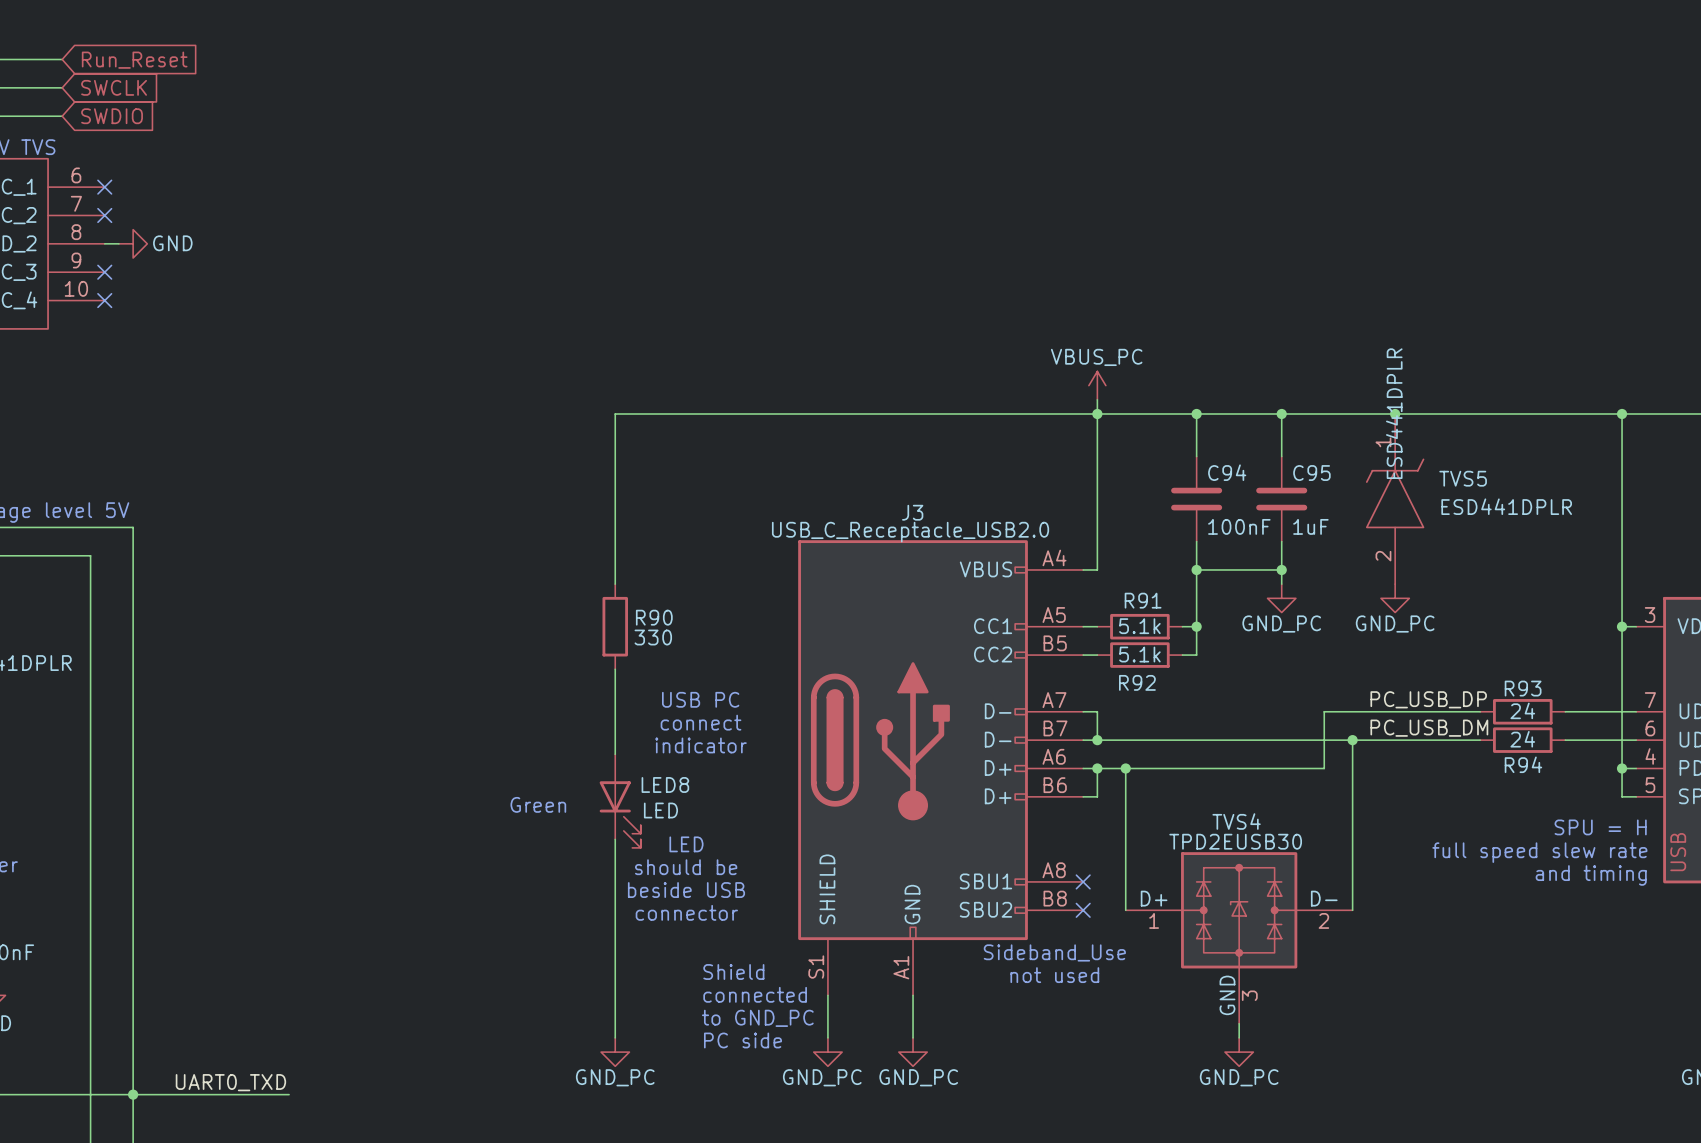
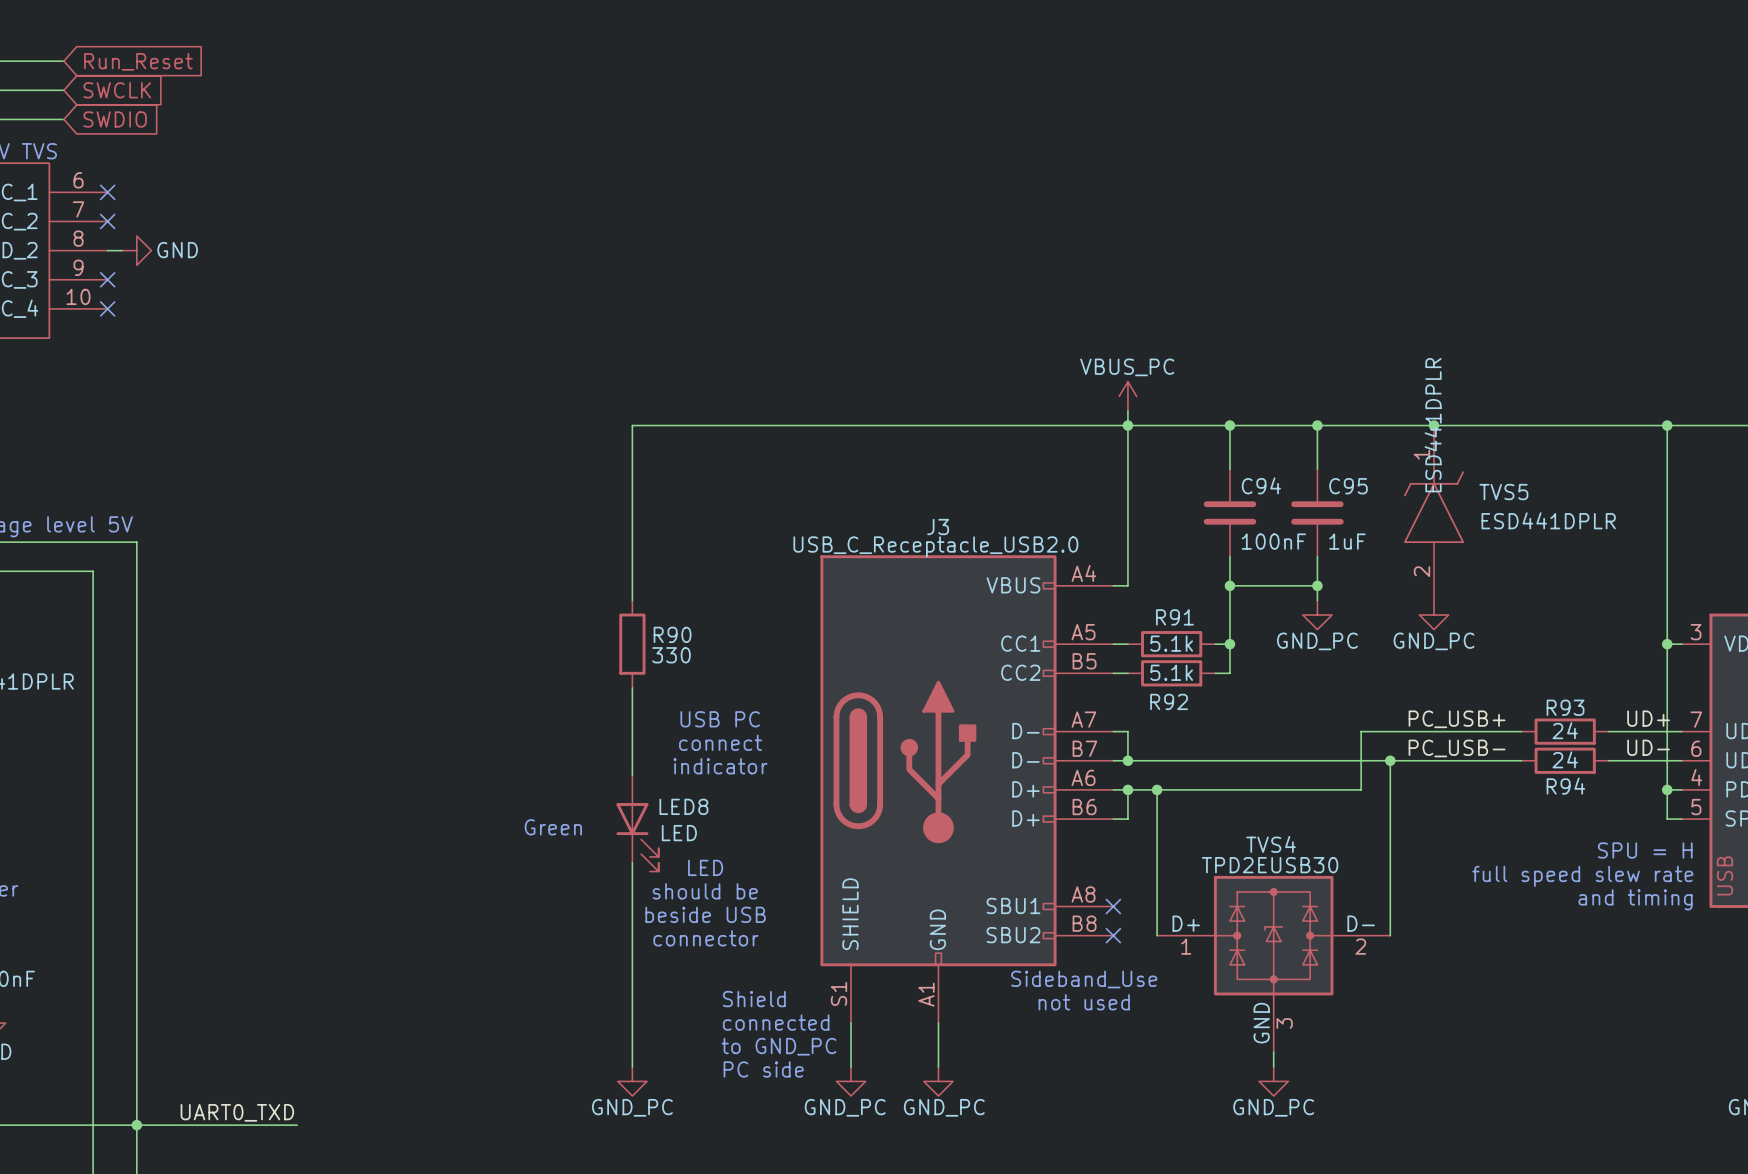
label: PC_USB_DP (1428, 699) -> PC_USB+ (1457, 719)
label: none -> UD+ (1648, 718)
label: none -> UD- (1648, 747)
label: PC_USB_DM (1429, 728) -> PC_USB- (1457, 748)

